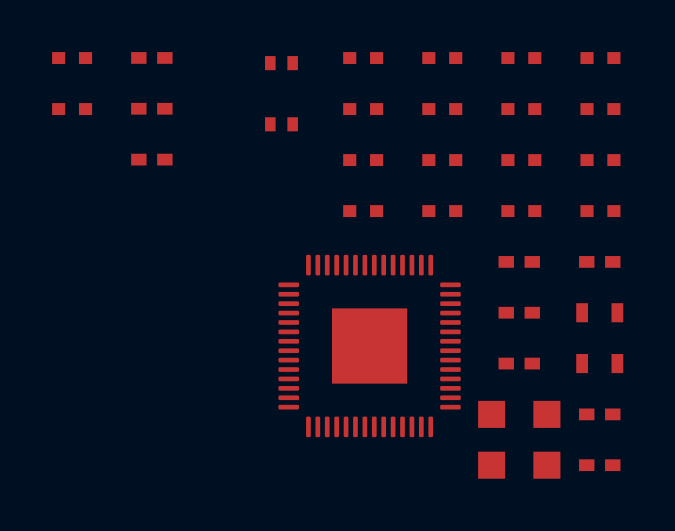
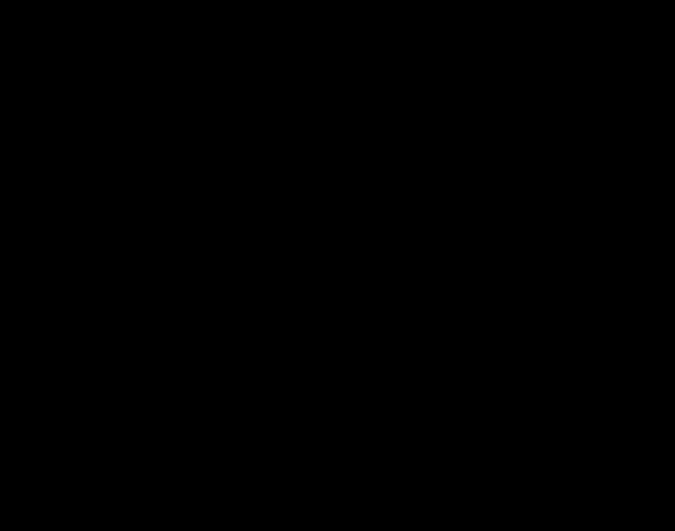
part: (151, 57) -> none
part: (72, 58) -> none
part: (363, 58) -> none
part: (442, 58) -> none
part: (521, 58) -> none
part: (600, 58) -> none
part: (281, 63) -> none
part: (151, 108) -> none
part: (72, 109) -> none
part: (363, 109) -> none
part: (442, 109) -> none
part: (521, 109) -> none
part: (600, 109) -> none
part: (281, 124) -> none
part: (151, 159) -> none
part: (363, 160) -> none
part: (442, 160) -> none
part: (521, 160) -> none
part: (600, 160) -> none
part: (363, 211) -> none
part: (442, 211) -> none
part: (521, 211) -> none
part: (600, 211) -> none
part: (519, 261) -> none
part: (599, 261) -> none
part: (519, 312) -> none
part: (599, 312) -> none
part: (369, 346) -> none
part: (519, 363) -> none
part: (599, 363) -> none
part: (519, 414) -> none
part: (599, 414) -> none
part: (519, 465) -> none
part: (599, 465) -> none

